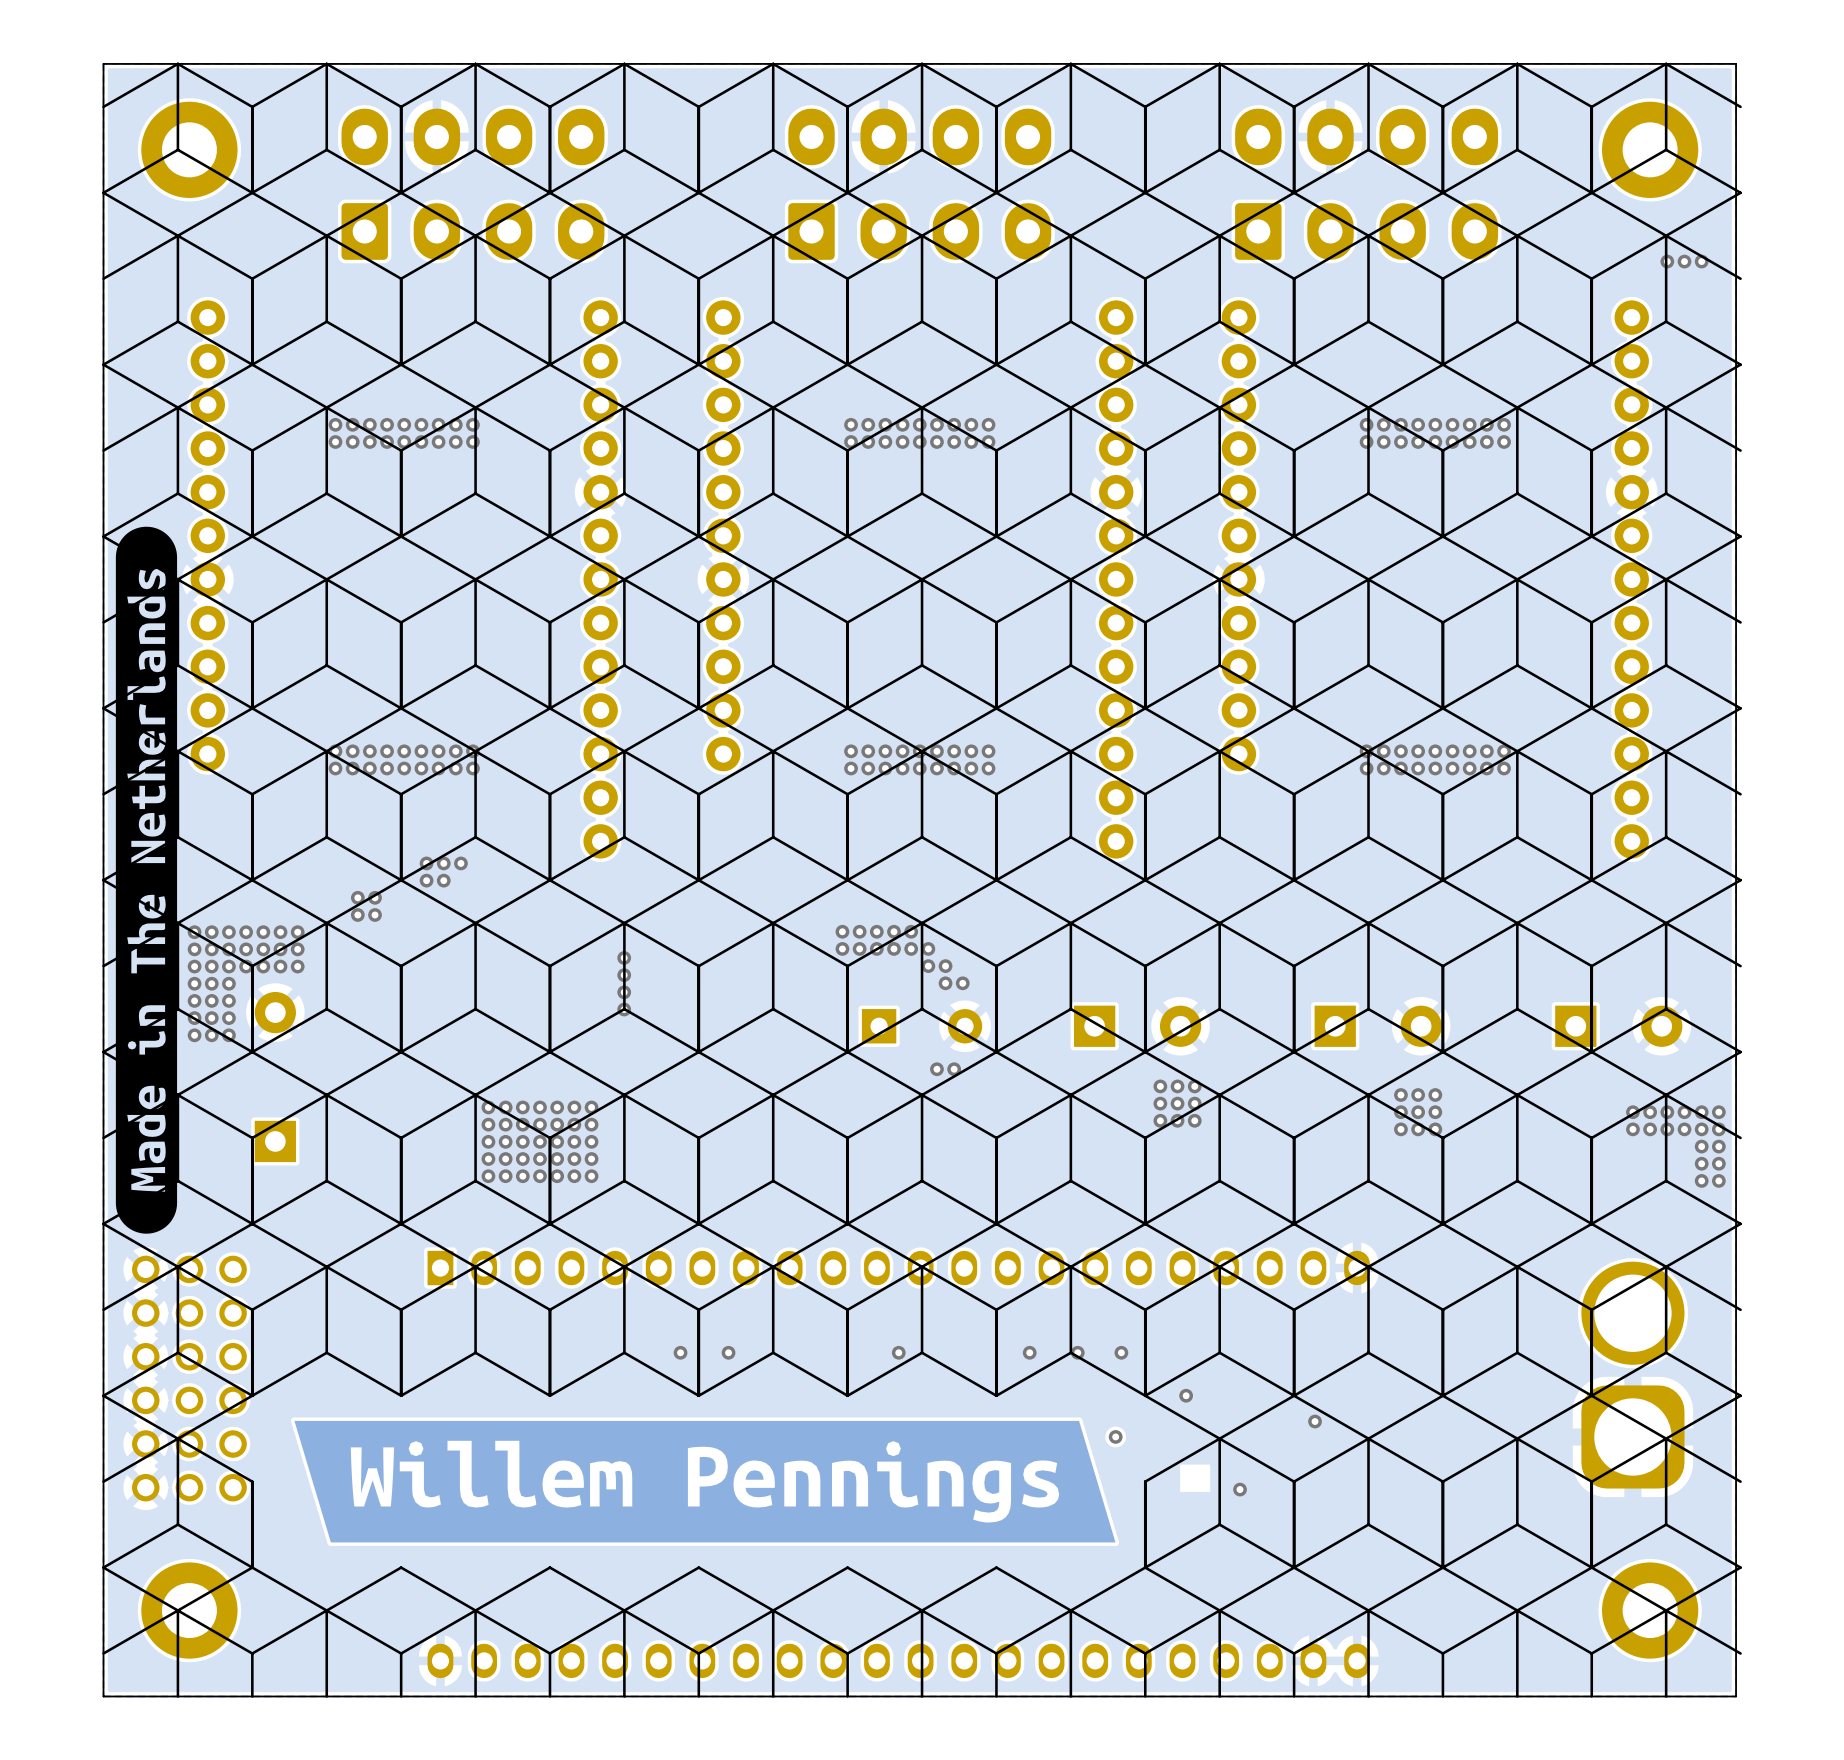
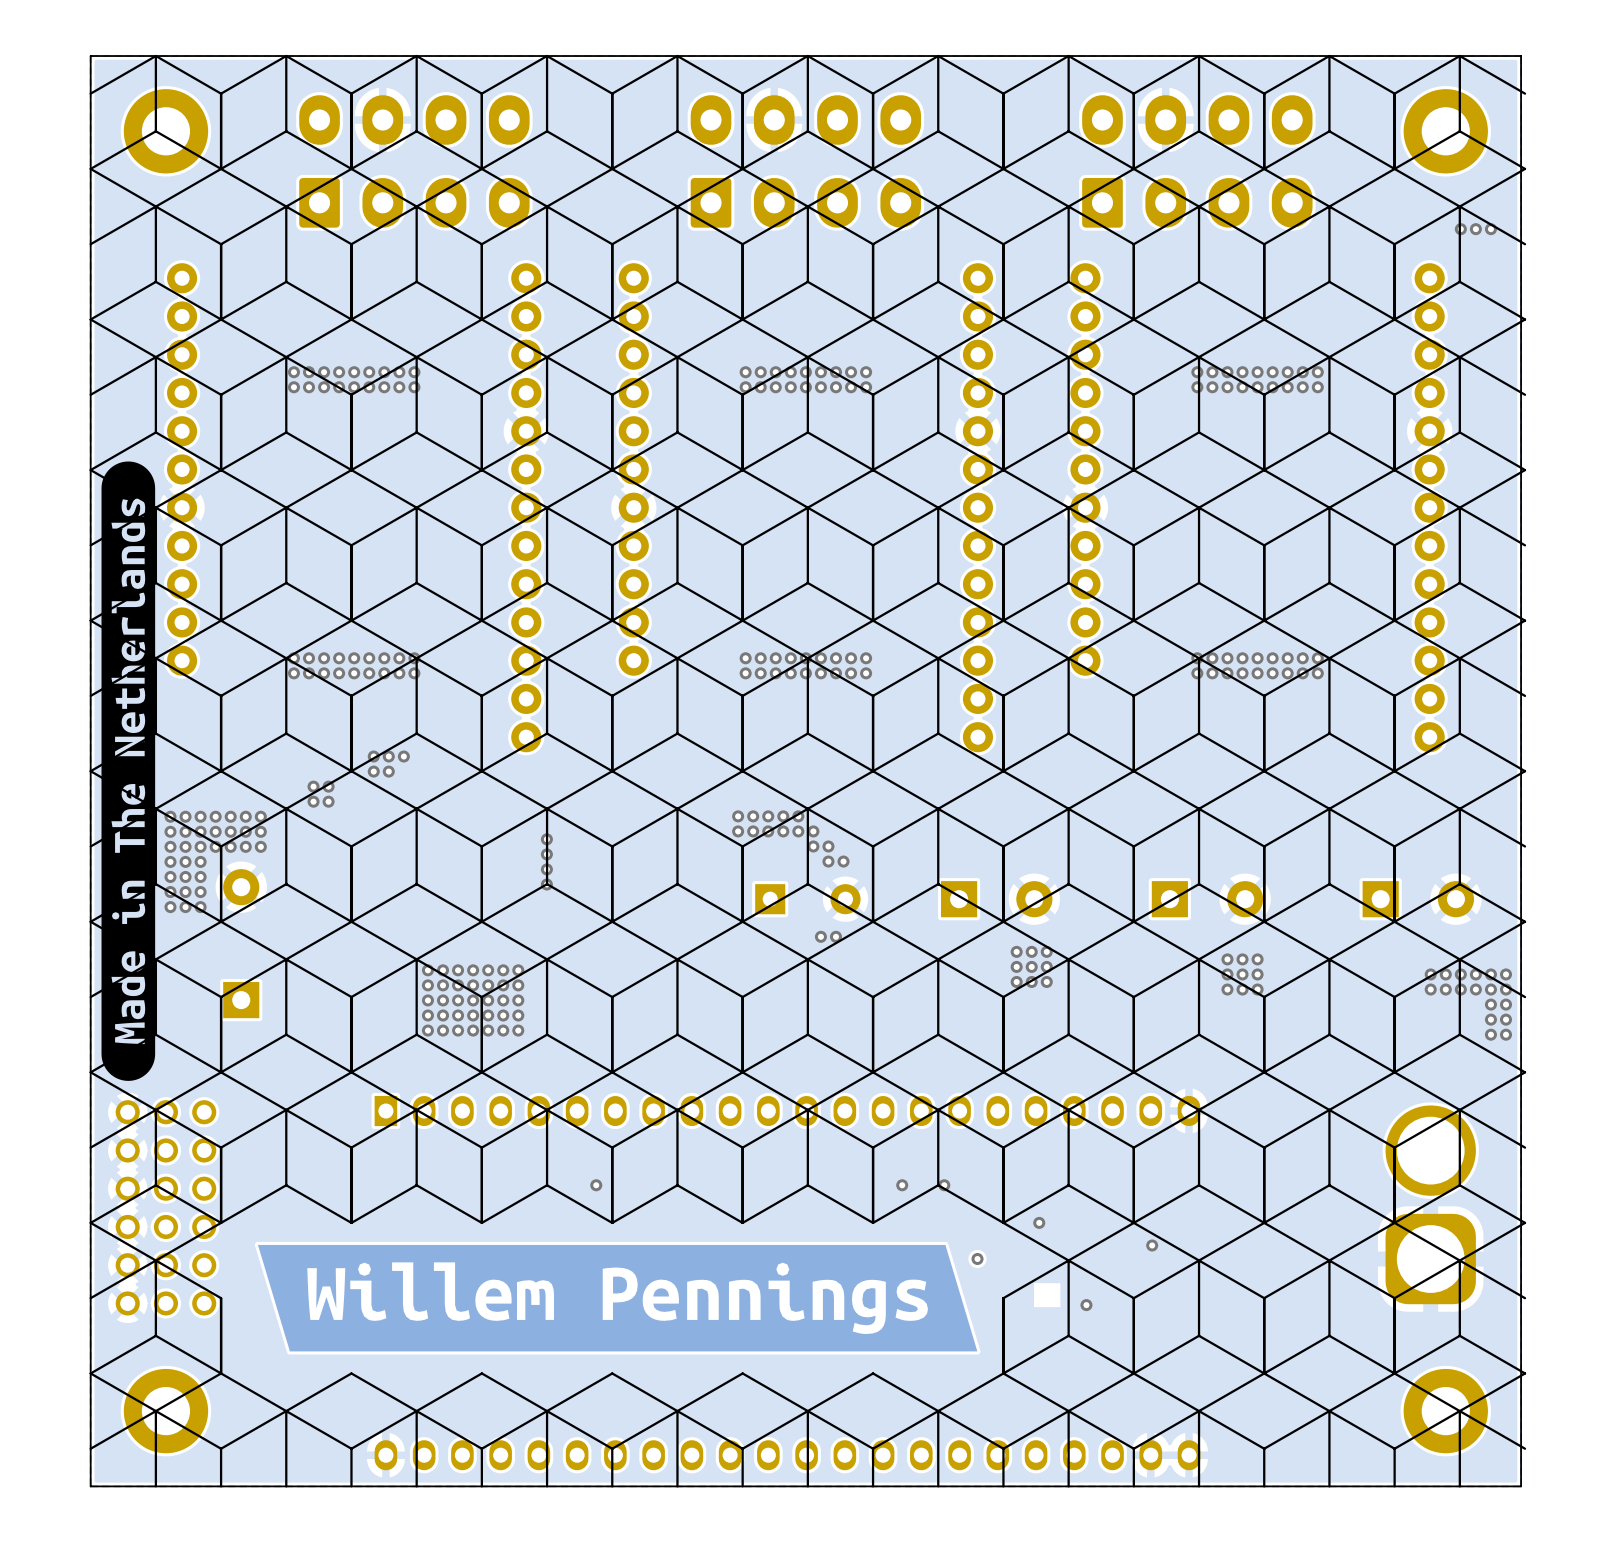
via: (728, 1352) -> none
via: (898, 1352) -> none
via: (1121, 1352) -> none

